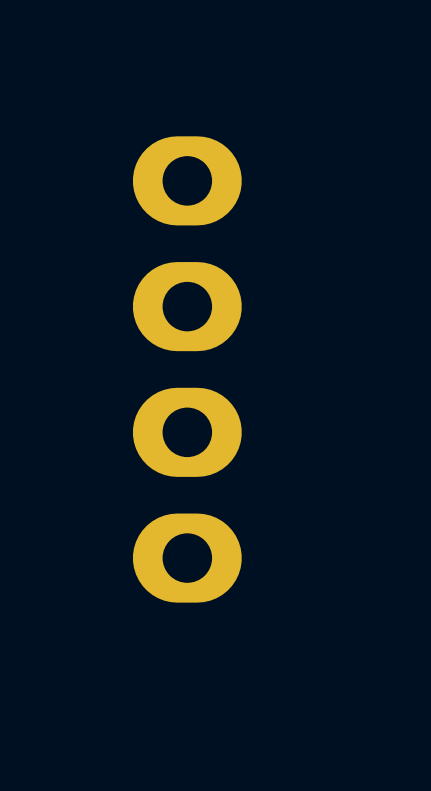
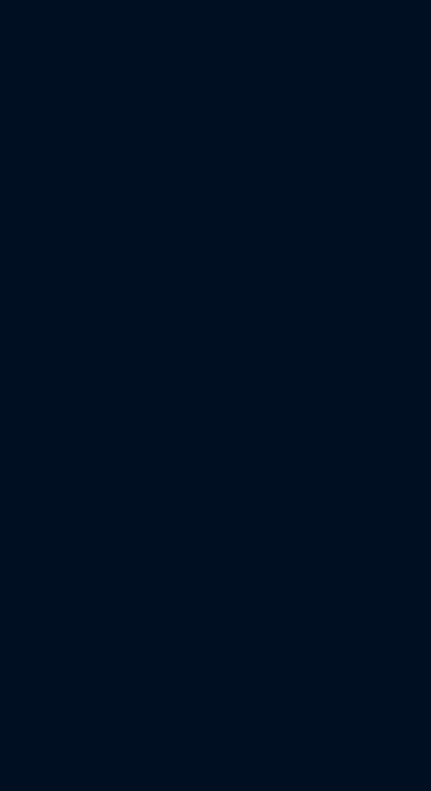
part: (187, 369) -> none

